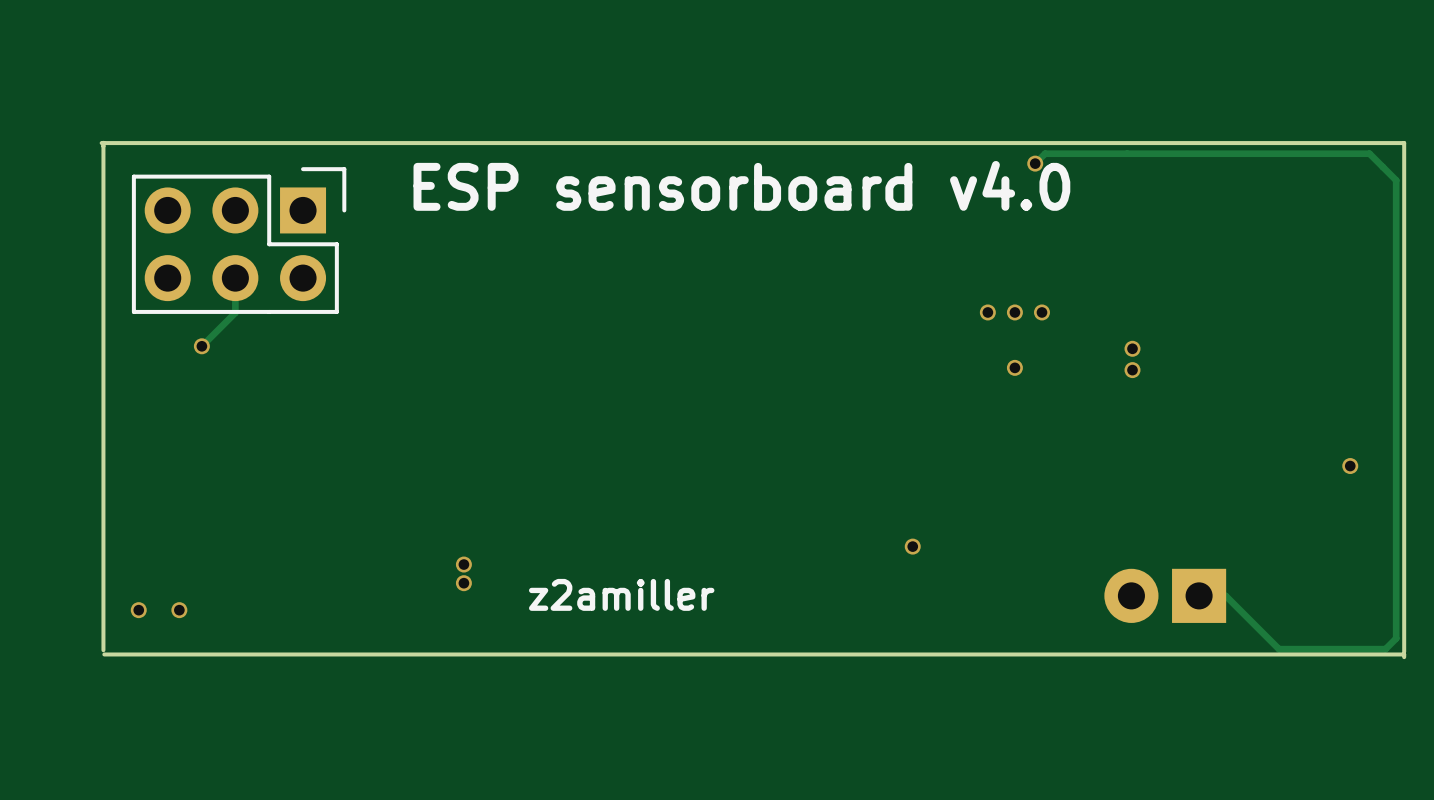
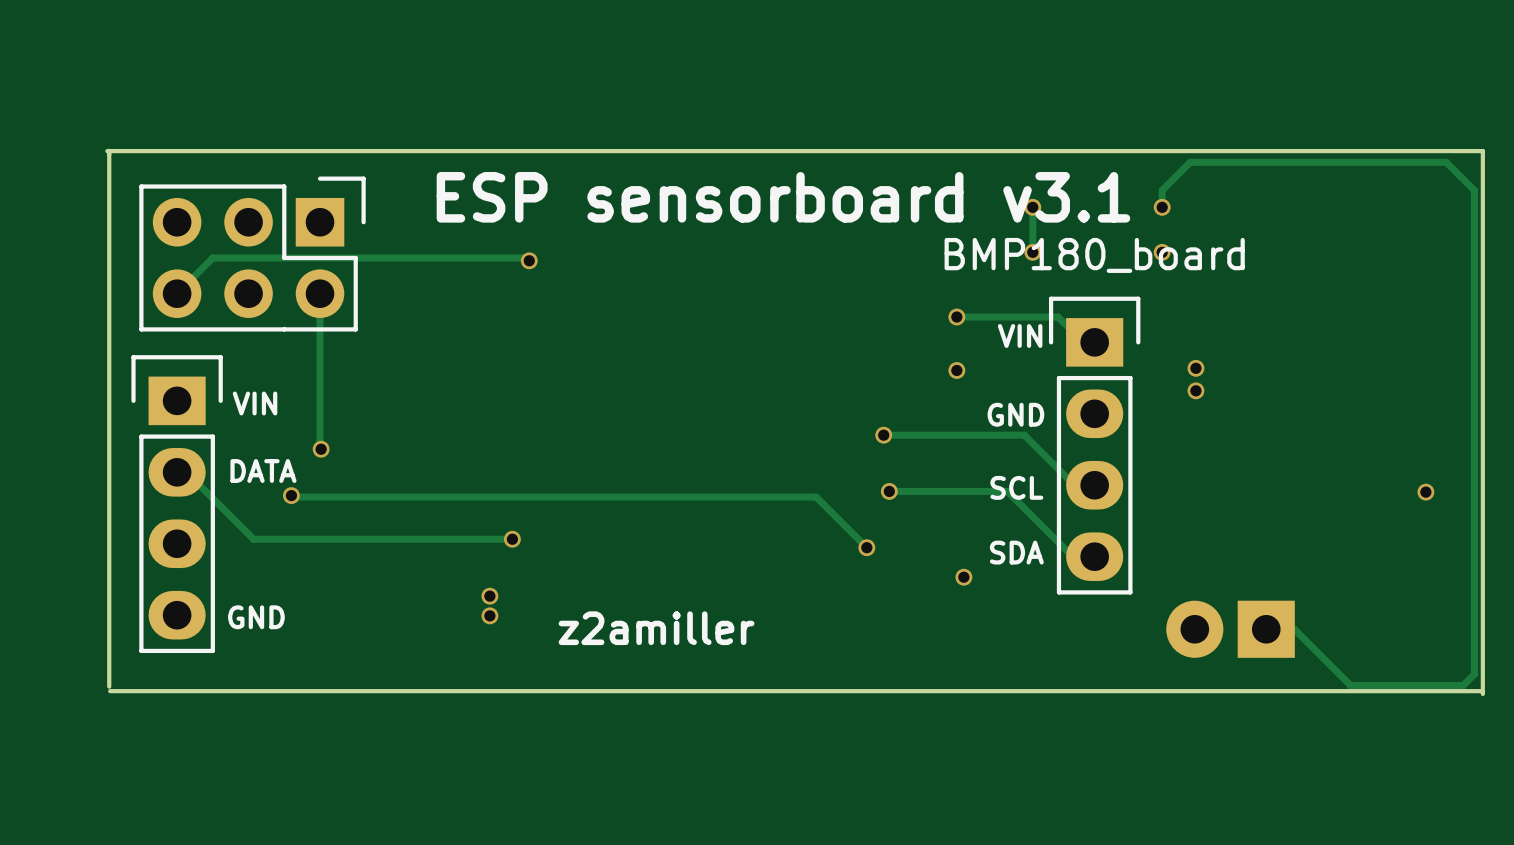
track: (1127, 153) (1045, 153) (1035, 163) -> (1190, 162) (1162, 190) (1162, 207)
via: (1035, 163) -> none
text: ESP sensorboard v4.0 (741, 185) -> ESP sensorboard v3.1 (783, 197)
track: none -> (1032, 207) (1032, 252)
via: none -> (1032, 207)
via: none -> (1162, 207)
via: none -> (1032, 252)
via: none -> (1162, 252)
track: none -> (529, 260) (526, 257) (212, 257) (177, 293)
via: none -> (529, 260)
track: (235, 278) (235, 312) (201, 346) -> none
track: none -> (320, 295) (321, 449)
track: none -> (956, 317) (1058, 317) (1083, 342) (1094, 342)
via: none -> (956, 317)
via: (987, 312) -> none
via: (1014, 312) -> none
via: (1041, 312) -> none
text: none -> VIN (1020, 335)
via: (201, 346) -> none
via: none -> (956, 370)
via: (1014, 367) -> none
text: none -> VIN (255, 403)
text: none -> GND (1015, 414)
track: none -> (883, 435) (1024, 435) (1074, 485) (1094, 485)
via: none -> (883, 435)
part: none -> BMP180_board (1094, 445)
via: none -> (321, 449)
text: none -> DATA (263, 471)
track: none -> (177, 472) (186, 472) (253, 539) (512, 539)
text: none -> SCL (1016, 487)
track: none -> (889, 491) (1007, 491) (1072, 556) (1094, 556)
via: none -> (889, 491)
track: none -> (291, 495) (816, 497) (866, 547)
via: none -> (291, 495)
part: none -> (177, 504)
via: none -> (512, 539)
via: none -> (866, 547)
text: none -> SDA (1016, 552)
text: none -> GND (256, 617)
via: (138, 610) -> none
via: (179, 610) -> none

